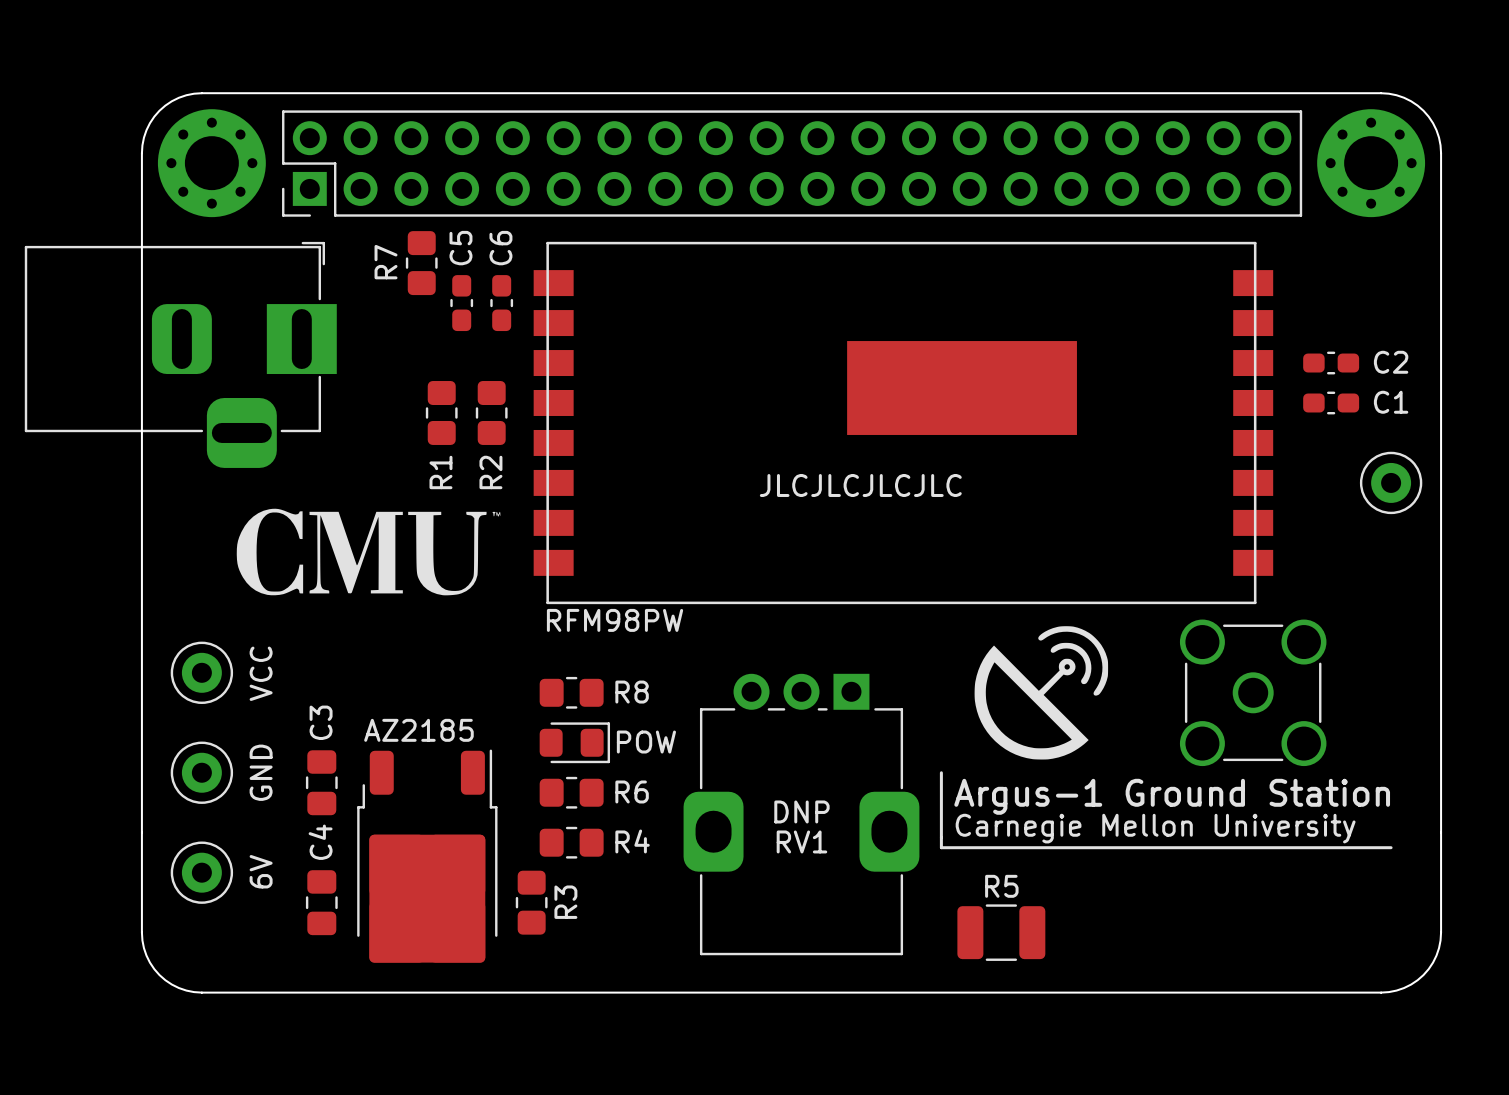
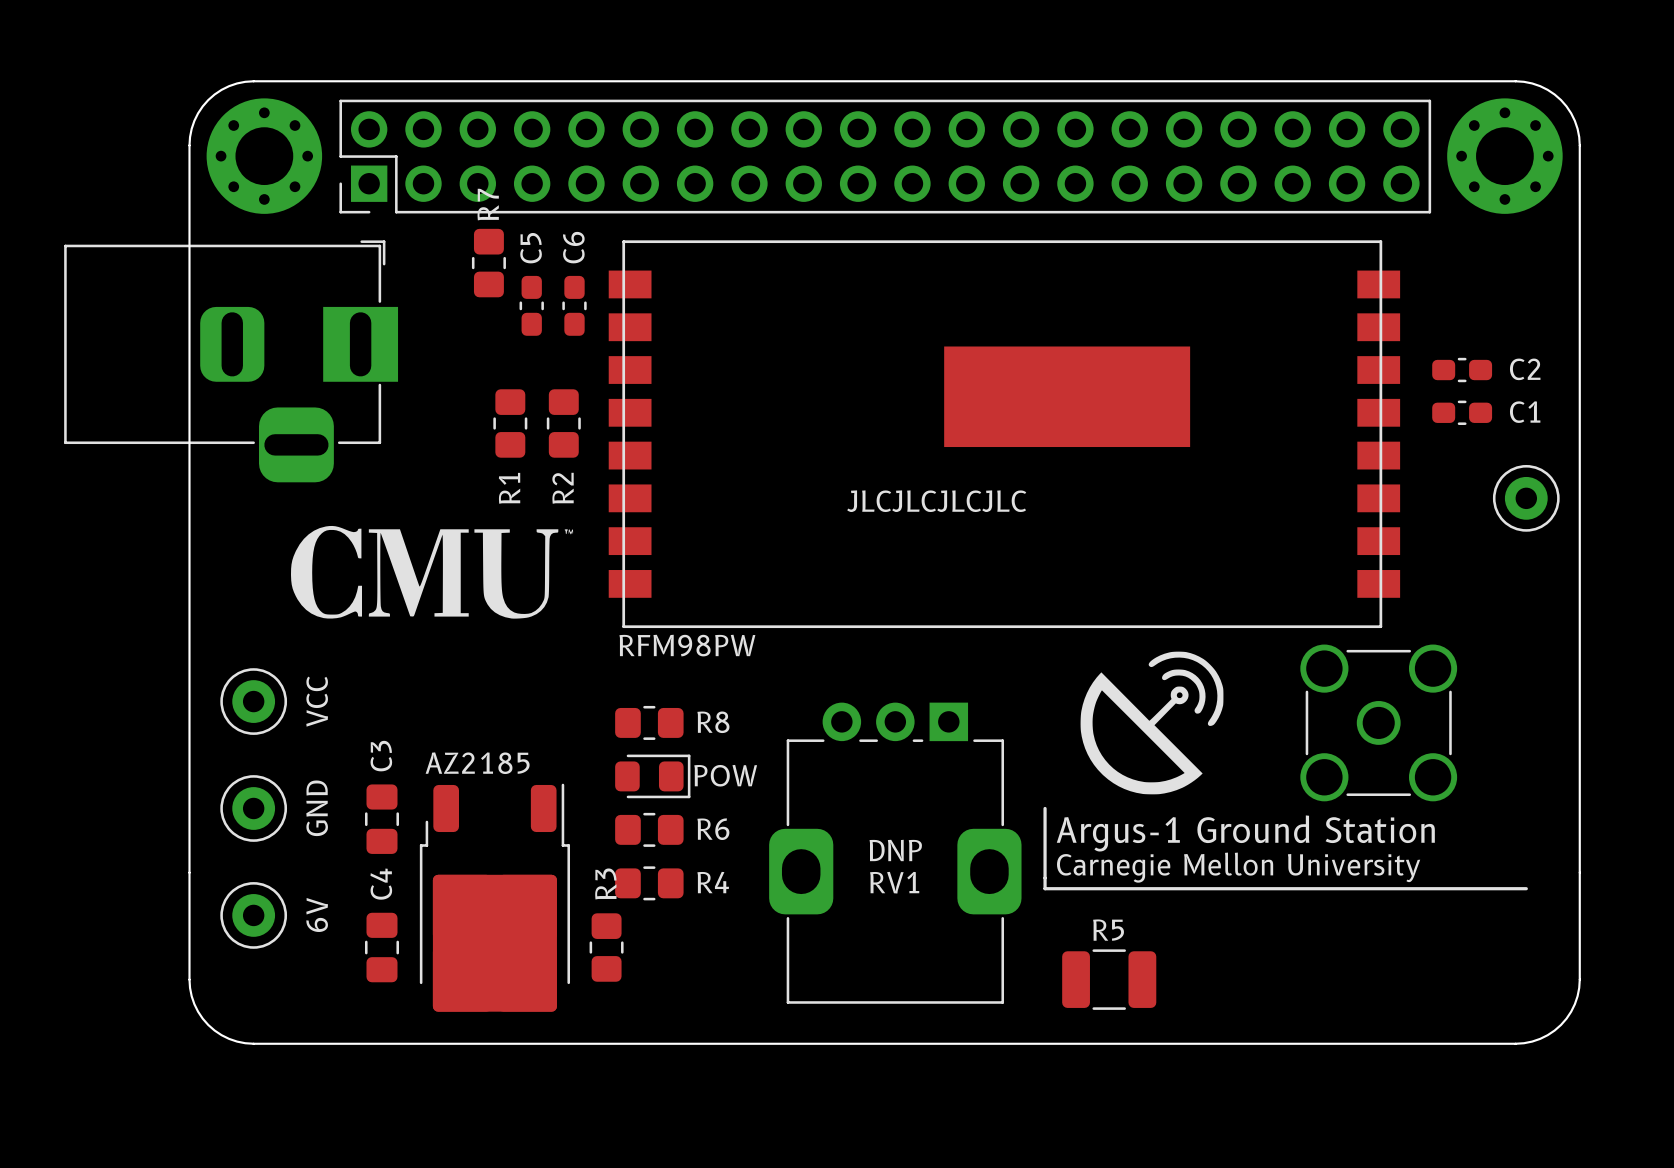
R7 name position: R7 (386, 262) -> R7 (488, 204)
R3 name position: R3 (565, 902) -> R3 (605, 883)

